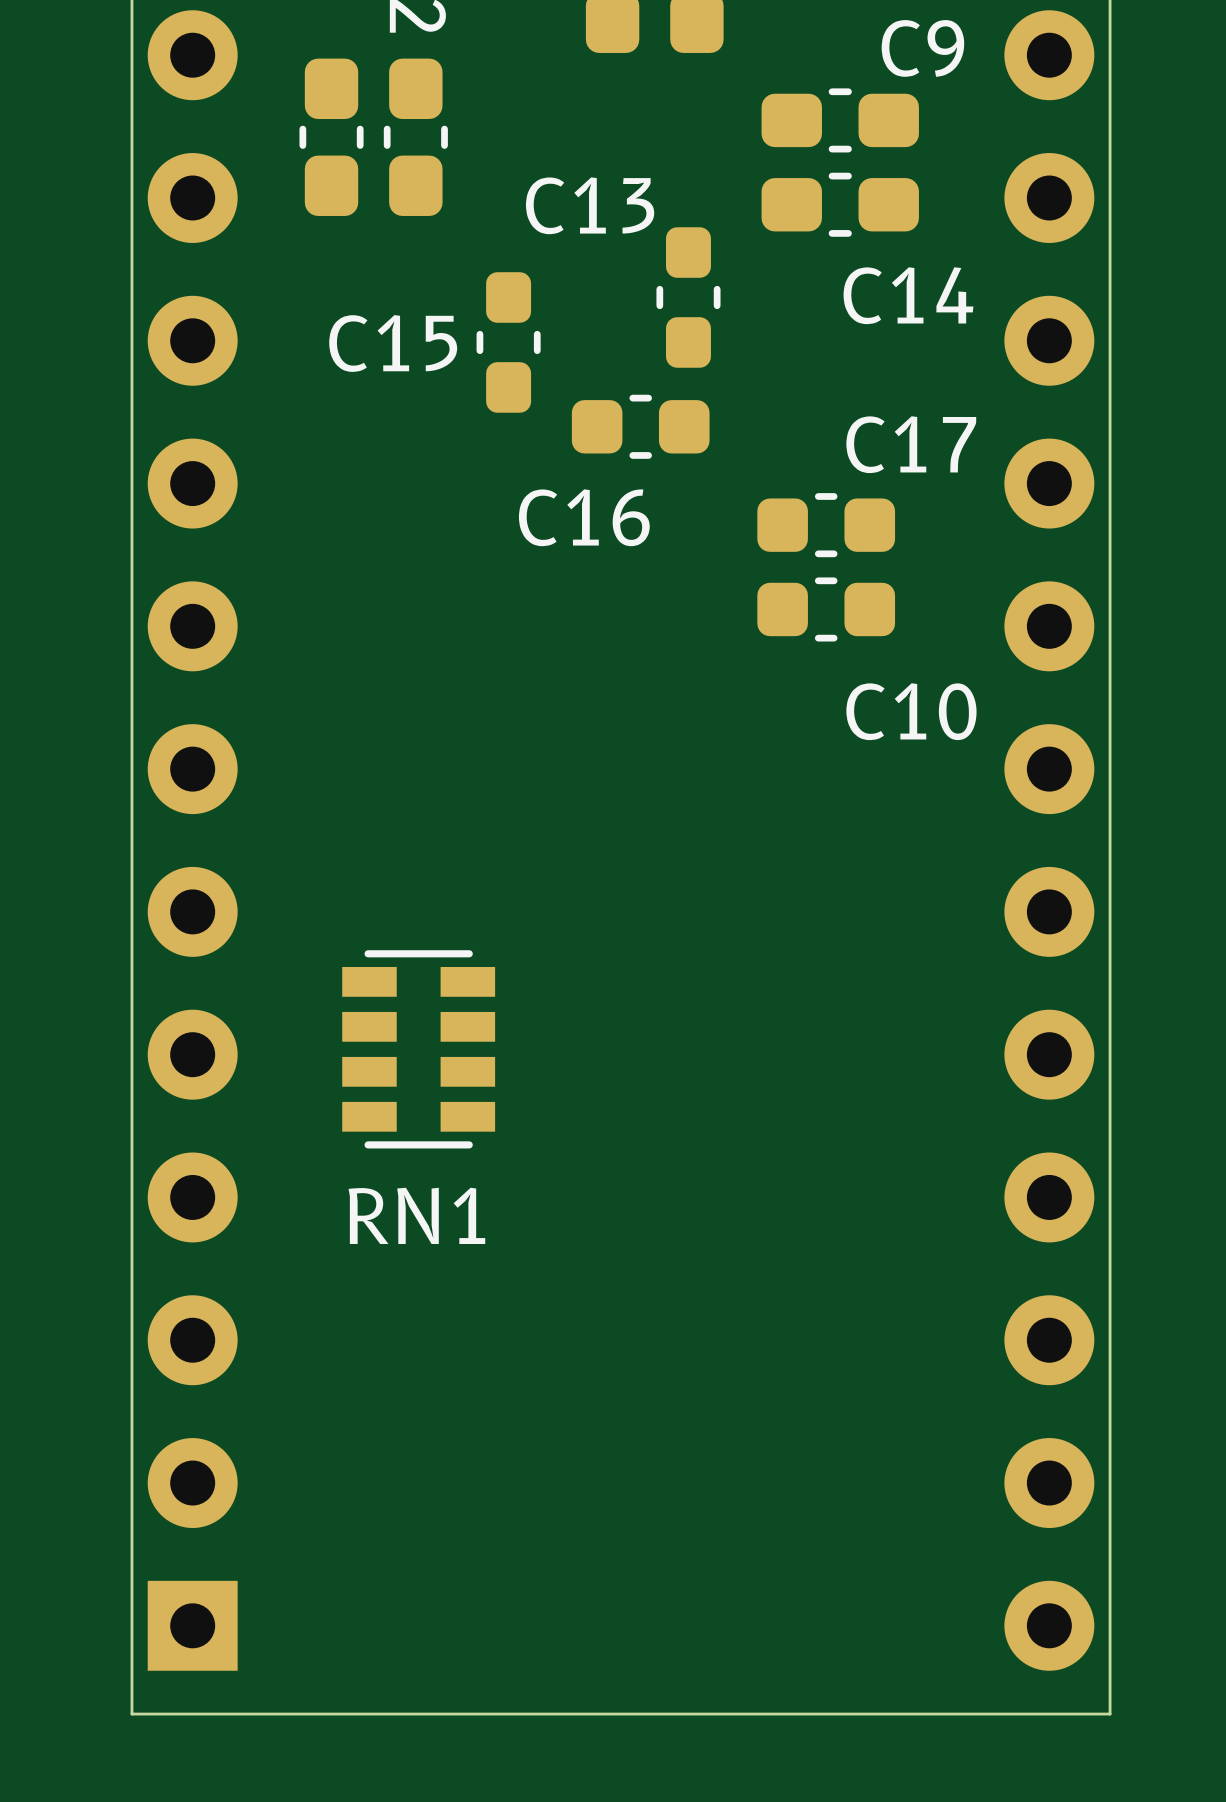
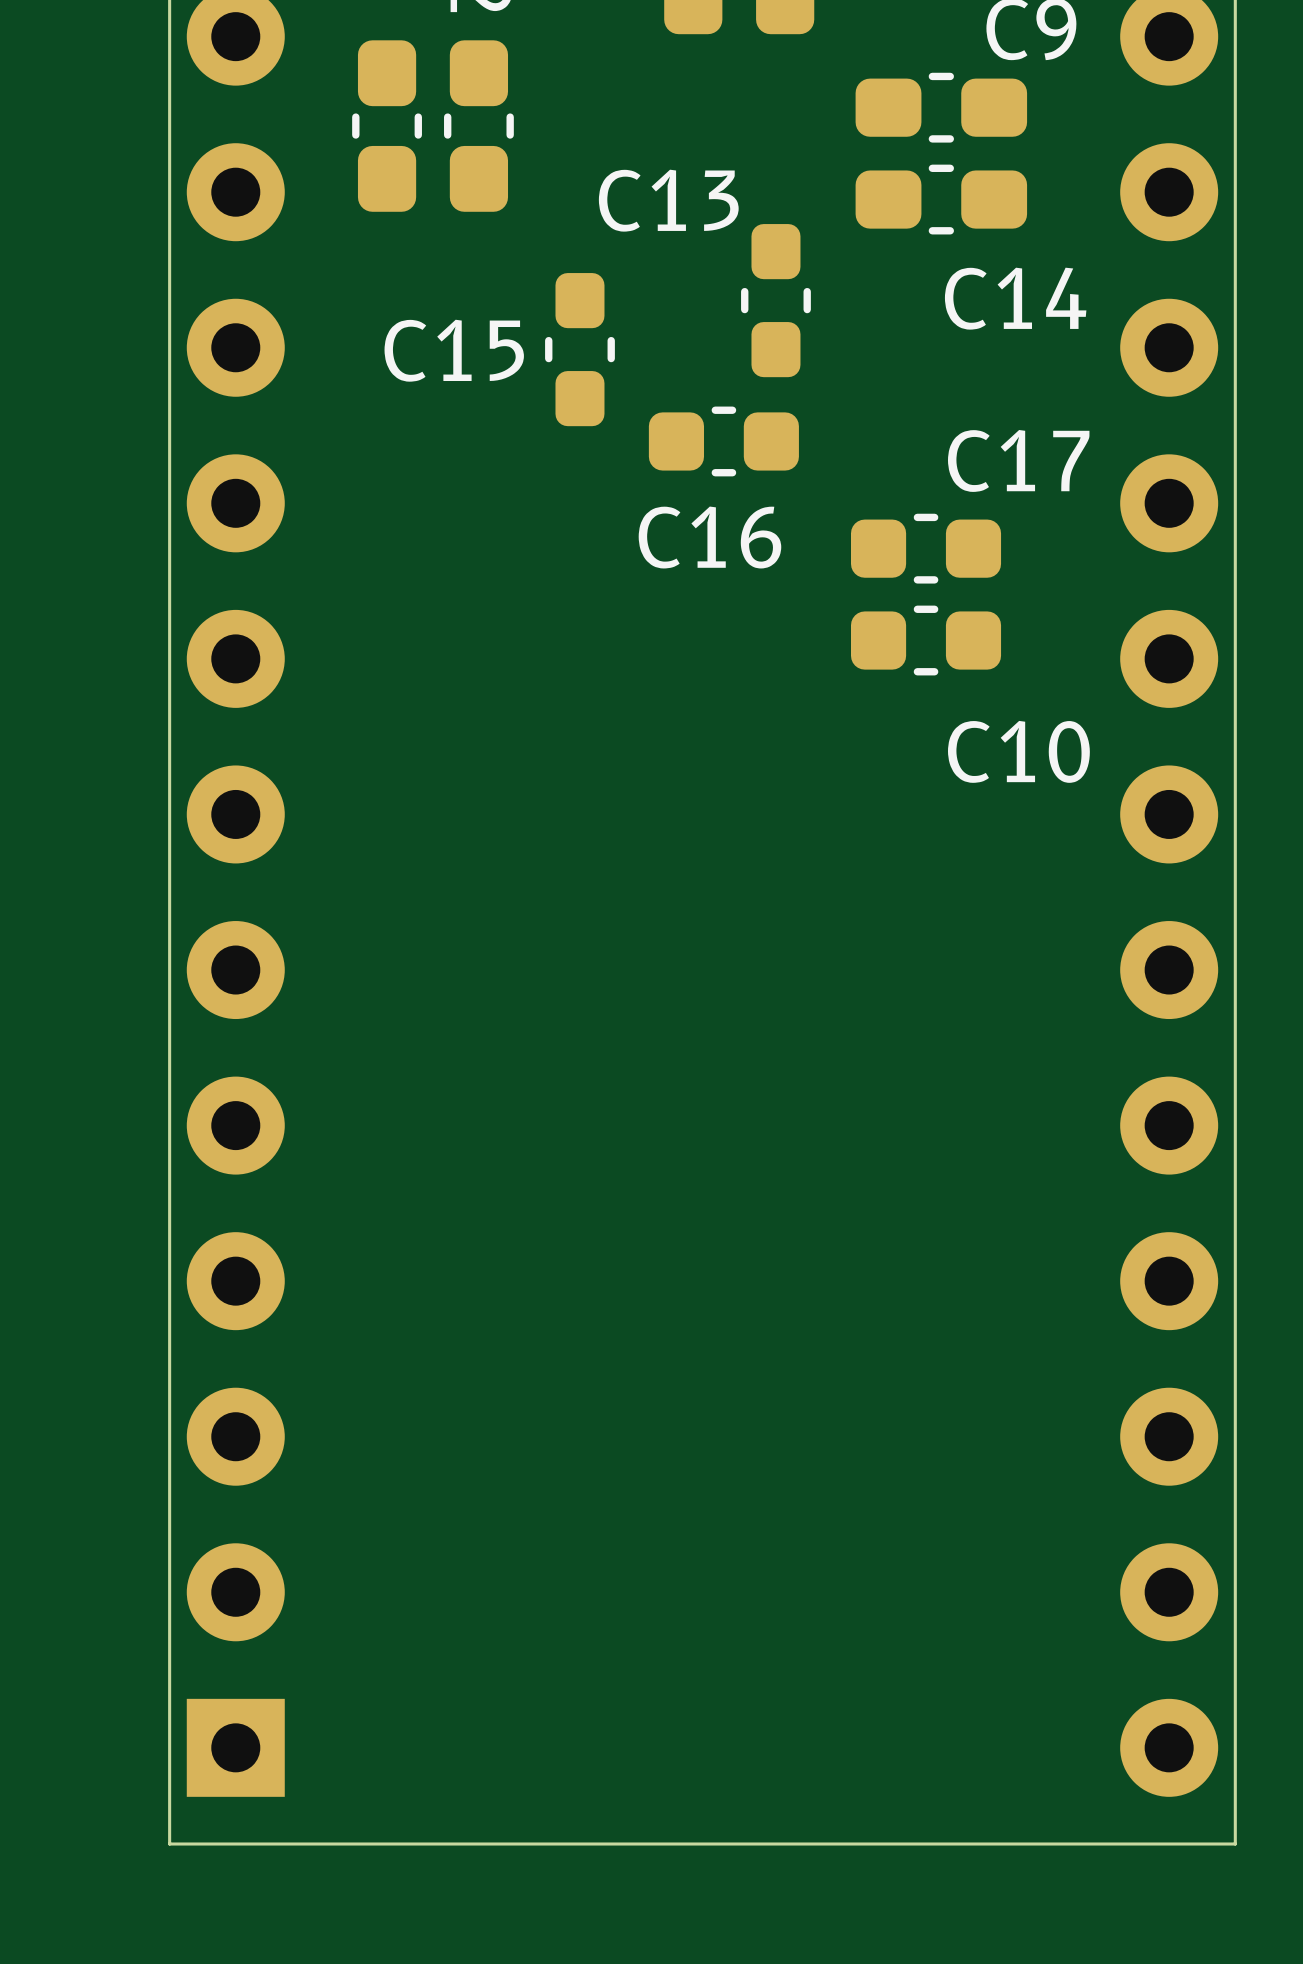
C16 name position: C16 (584, 517) -> C16 (709, 537)
RN1: (418, 1049) -> none

